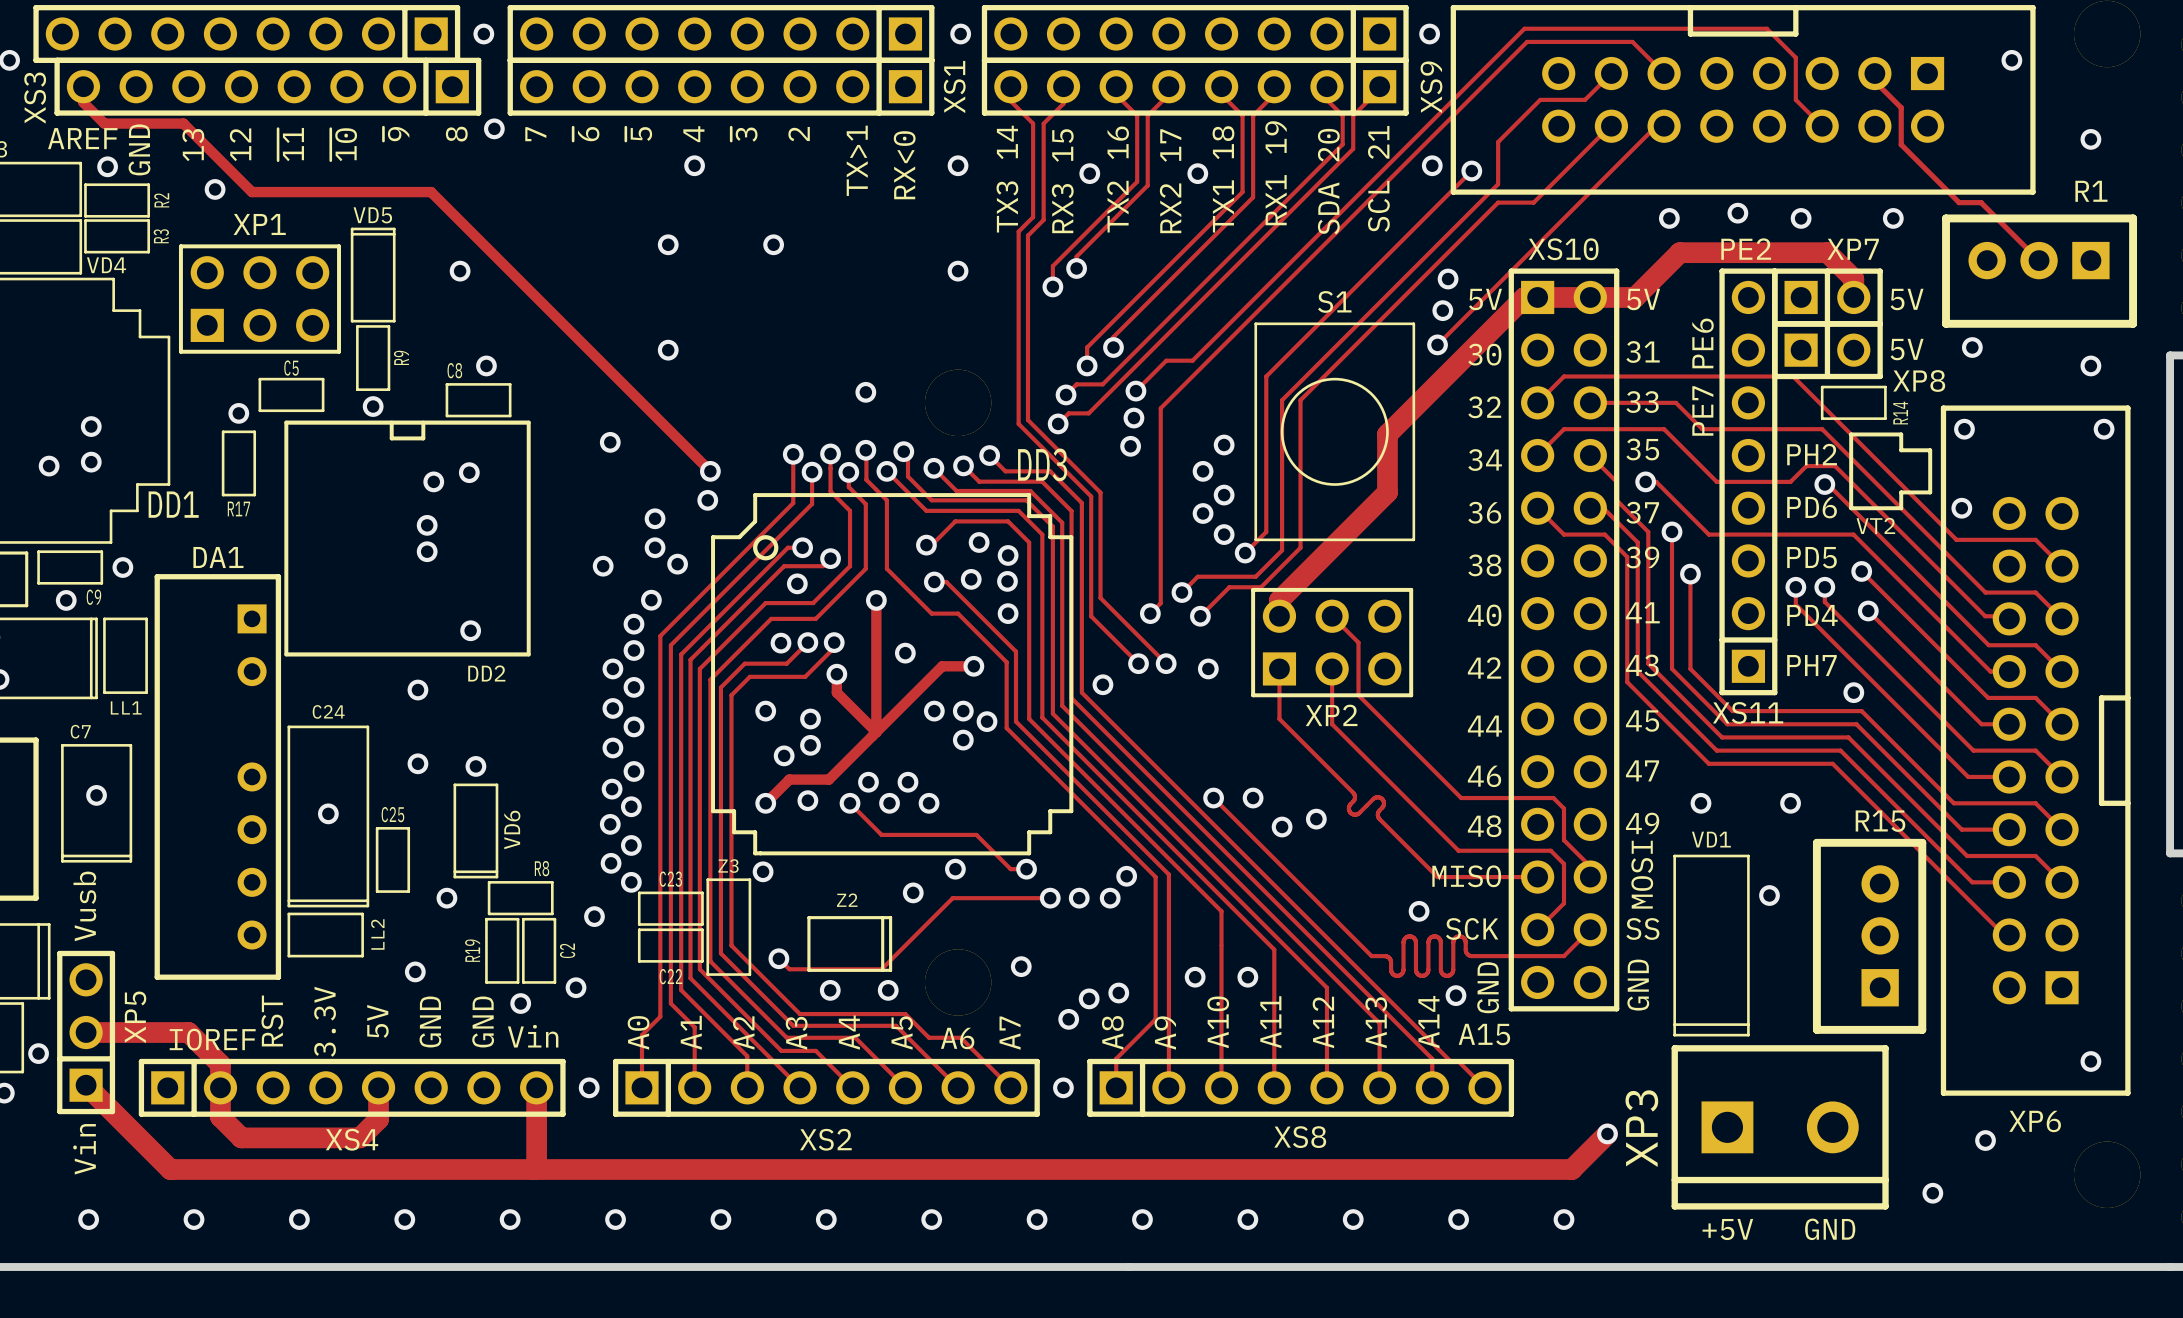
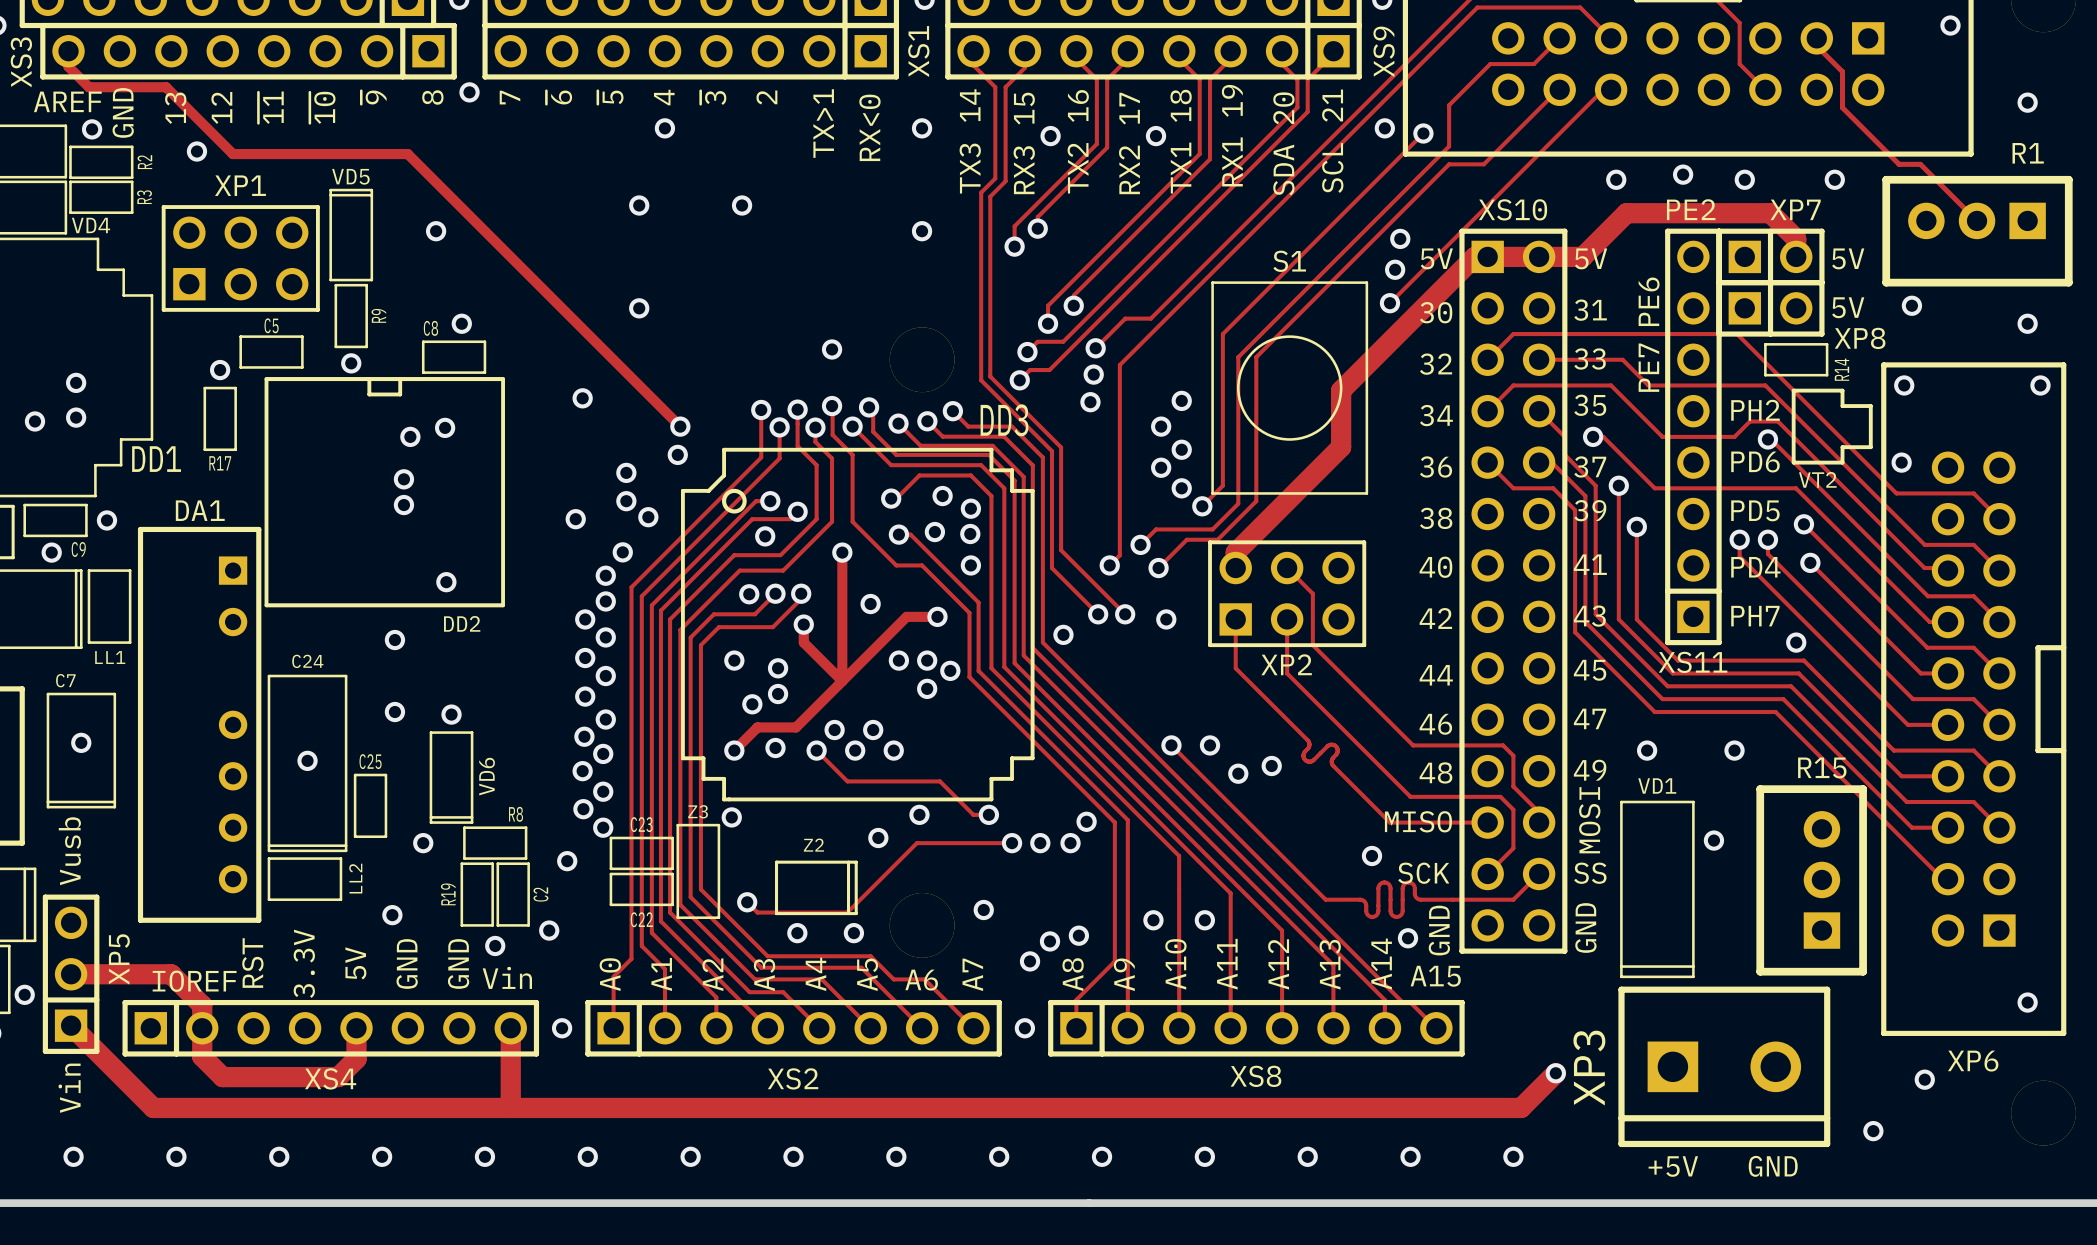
track: (1384, 956) (1390, 959) (1392, 973) (1397, 975) (1403, 971) (1403, 941) (1408, 936) (1412, 936) (1415, 941) (1416, 971) (1420, 975) (1424, 975) (1428, 971) (1428, 942) (1431, 936) (1437, 936) (1440, 941) (1440, 969) (1444, 975) (1449, 975) (1453, 971) (1453, 942) (1455, 937) (1459, 936) (1464, 938) (1466, 952) (1471, 956) -> (1338, 899) (1362, 900) (1365, 903) (1367, 914) (1374, 916) (1378, 911) (1378, 886) (1384, 882) (1390, 886) (1390, 911) (1394, 916) (1398, 916) (1402, 913) (1402, 887) (1405, 883) (1413, 884) (1416, 897) (1423, 899)

